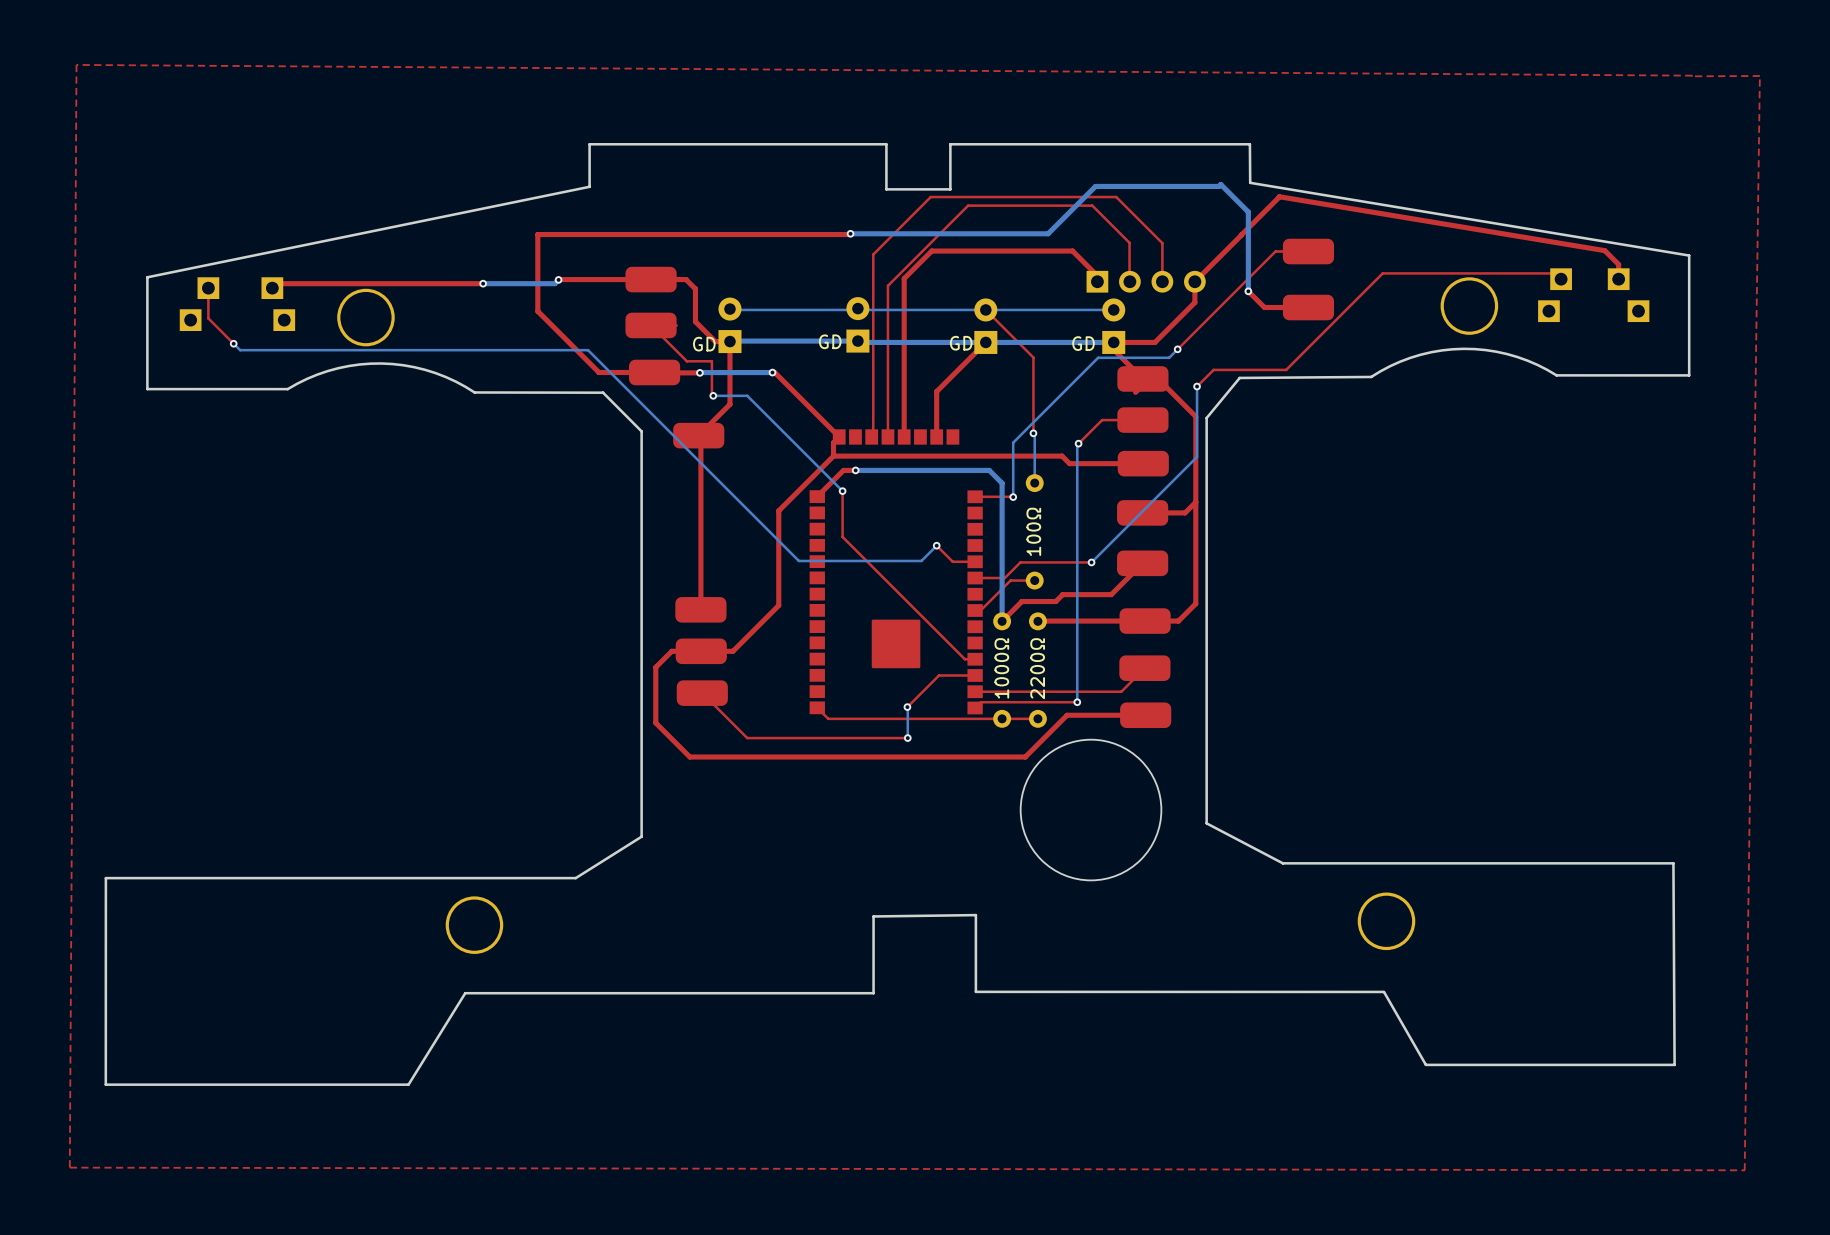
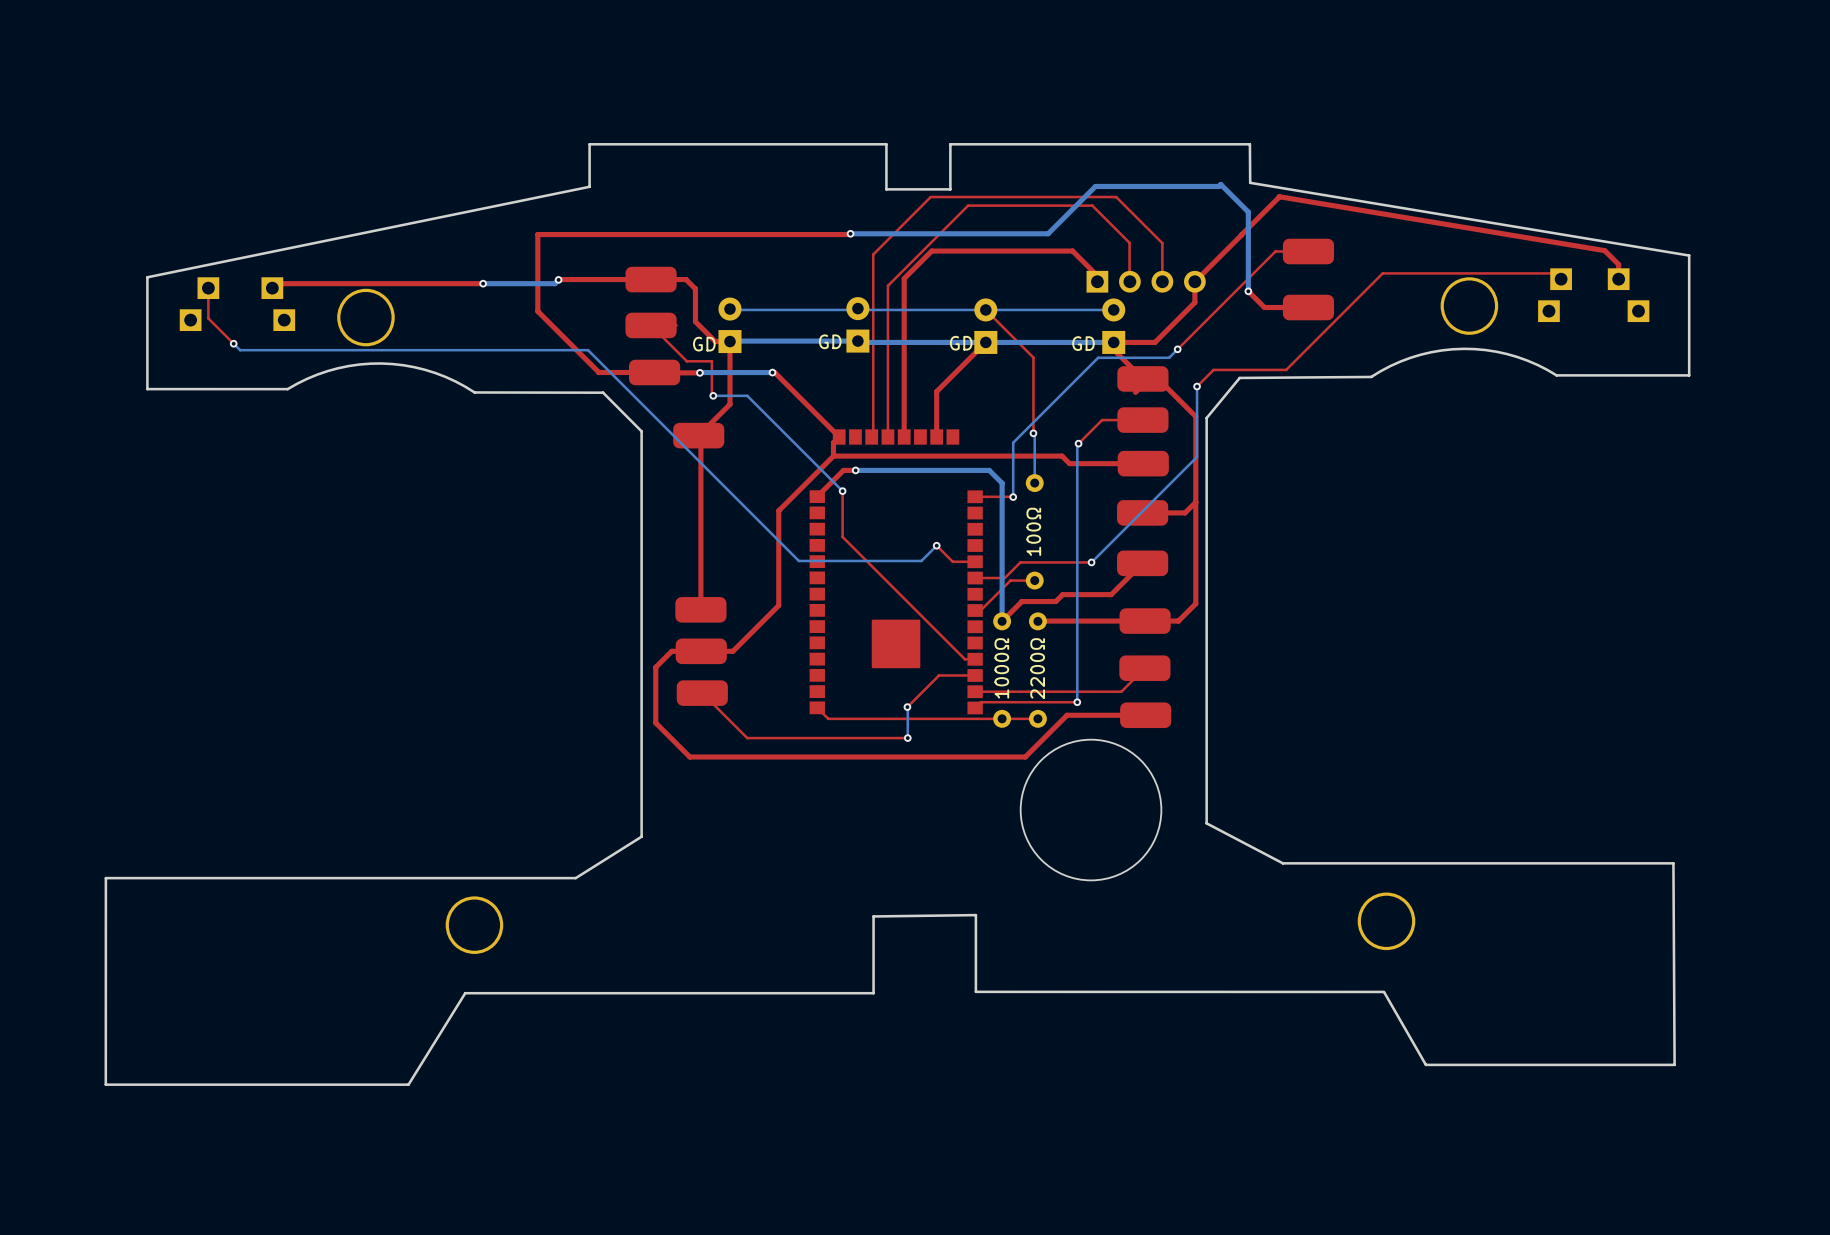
top zone outline: (76, 64) (1759, 75) (1744, 1170) (69, 1167) (76, 64) -> none

